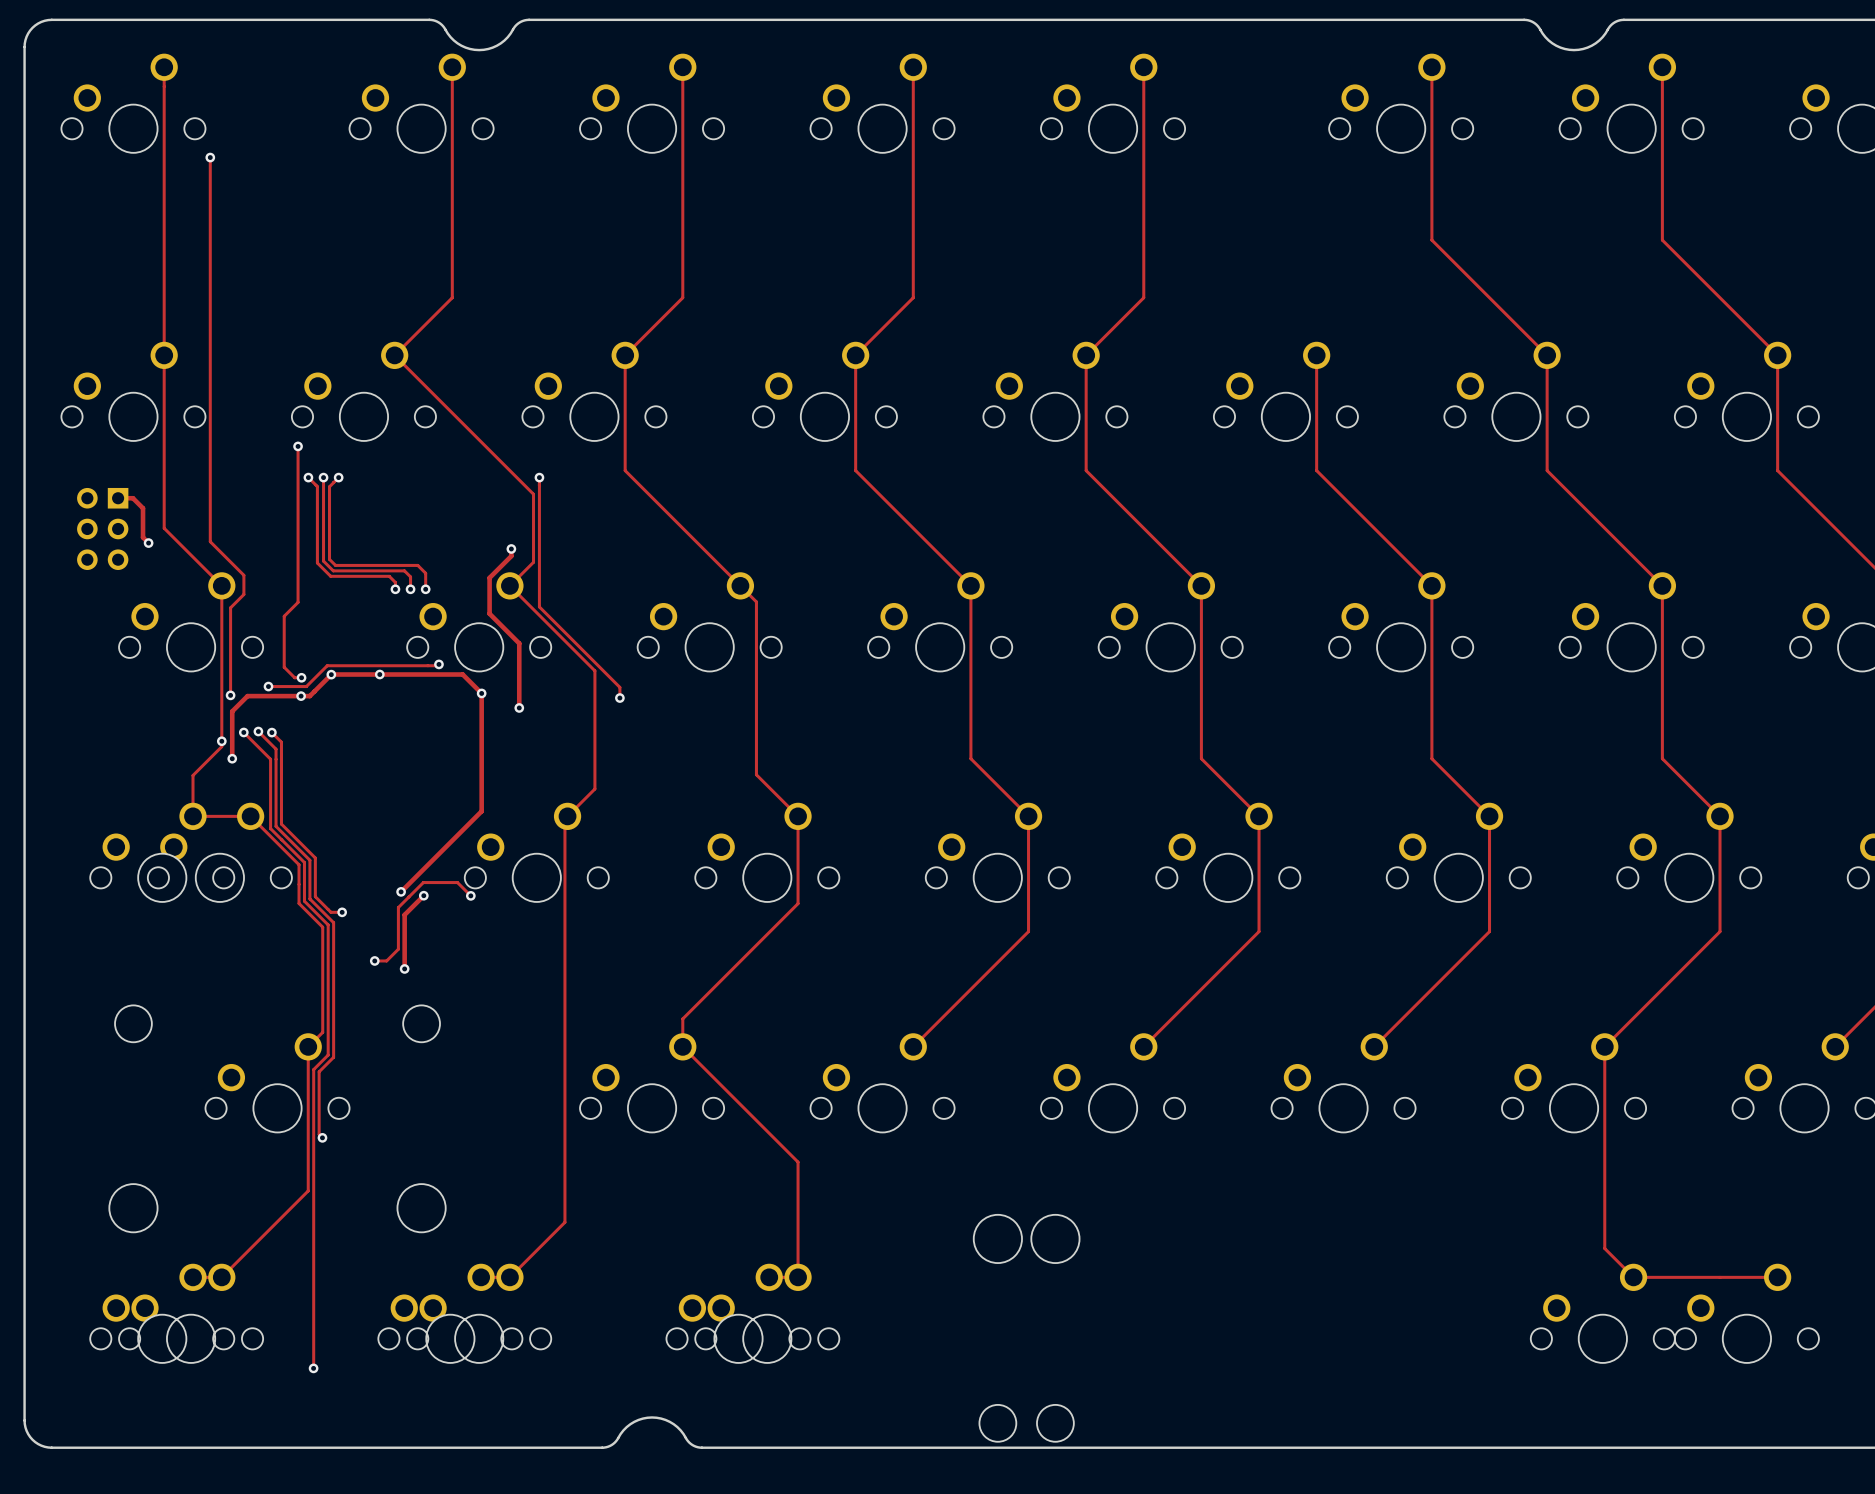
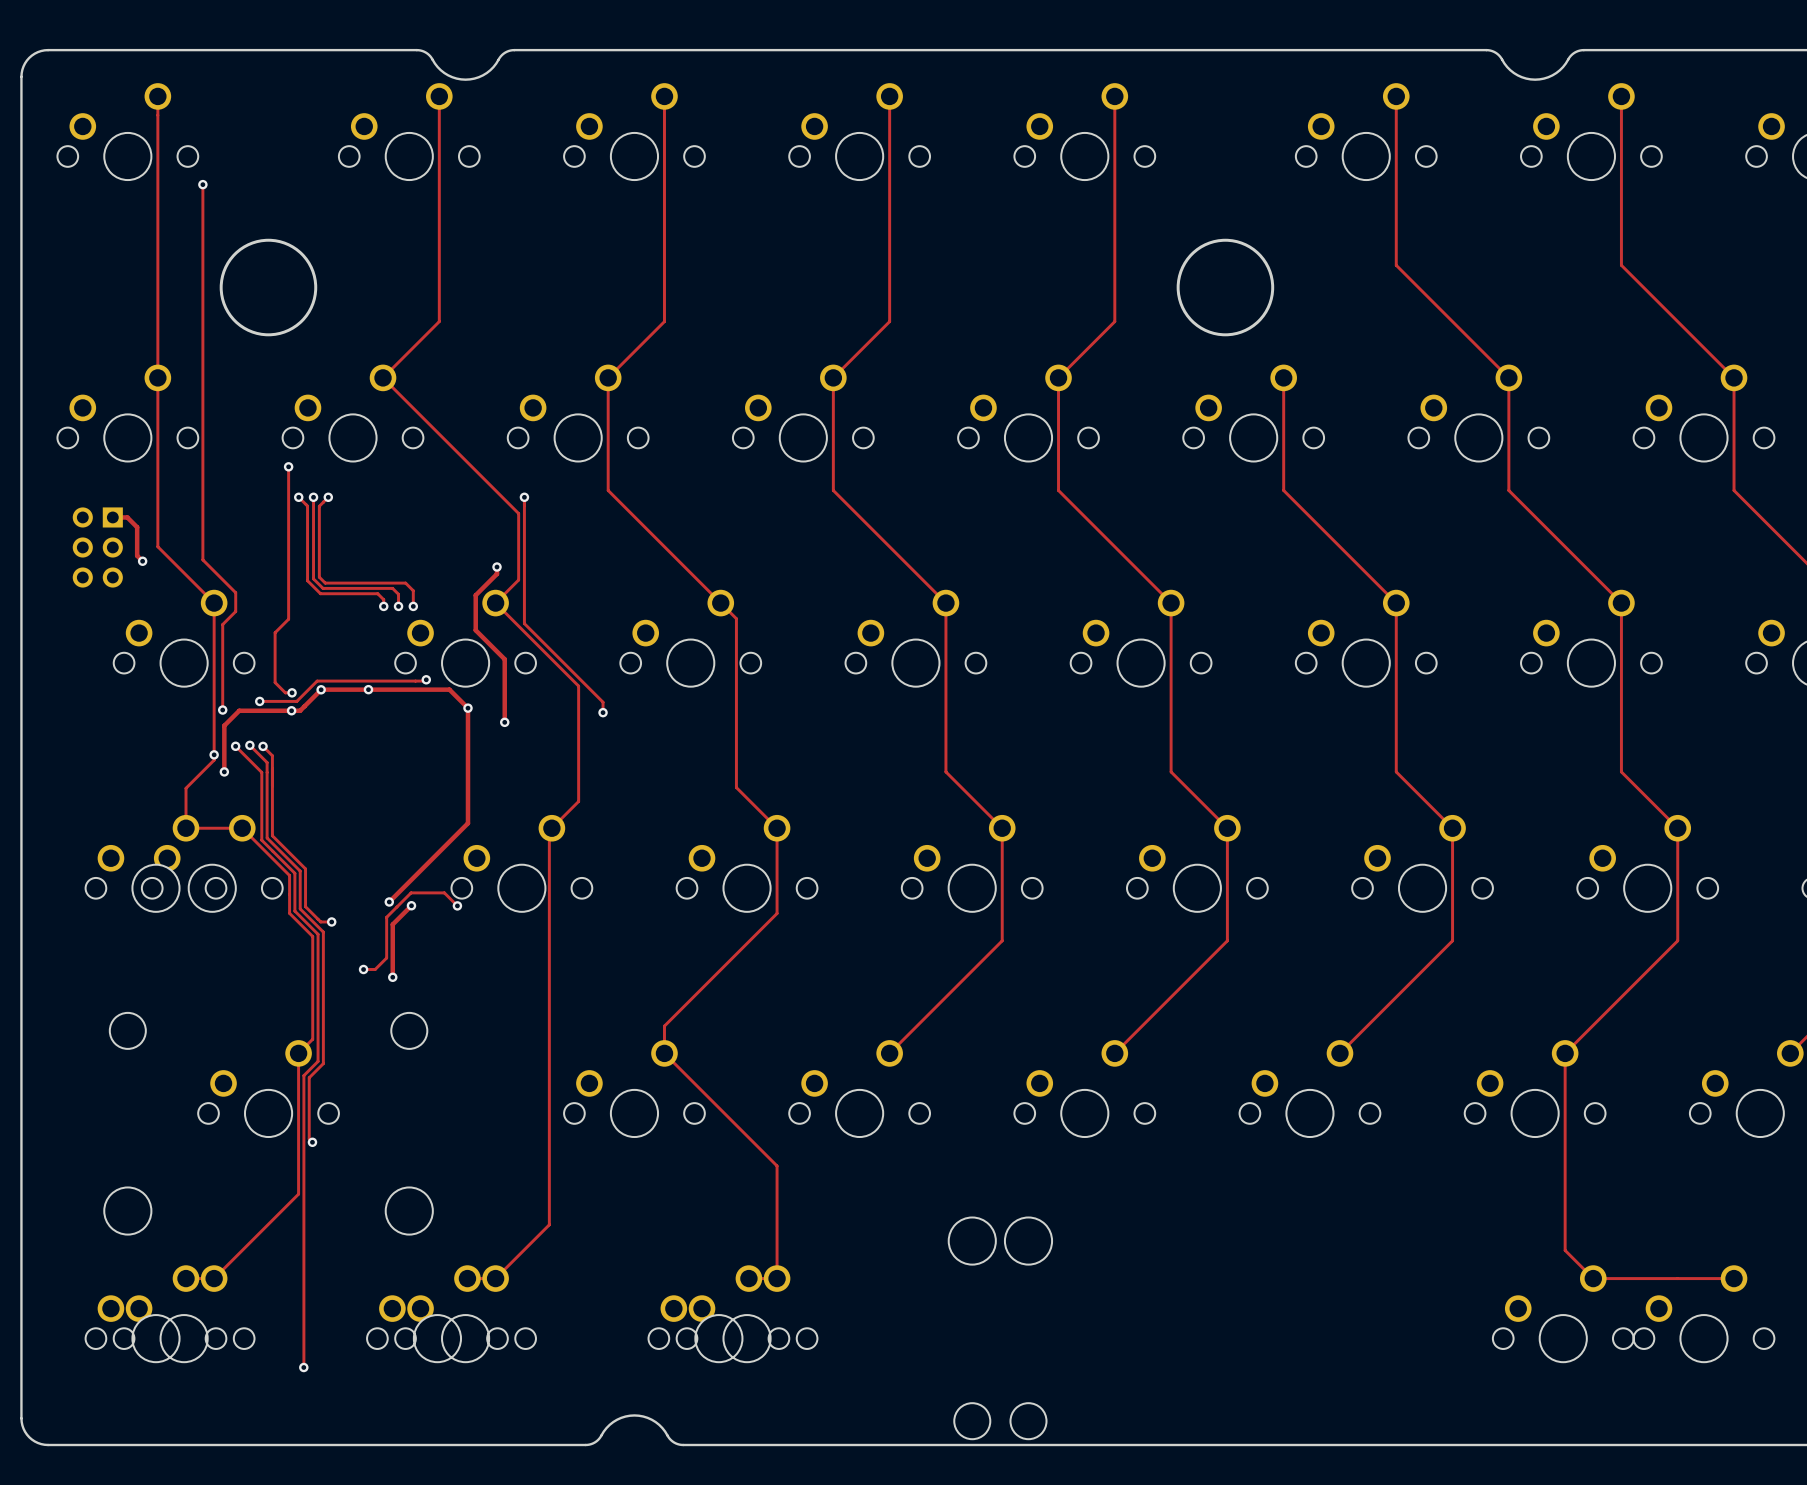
round board edge: none -> [219, 238, 318, 337]
round board edge: none -> [1176, 238, 1275, 337]

